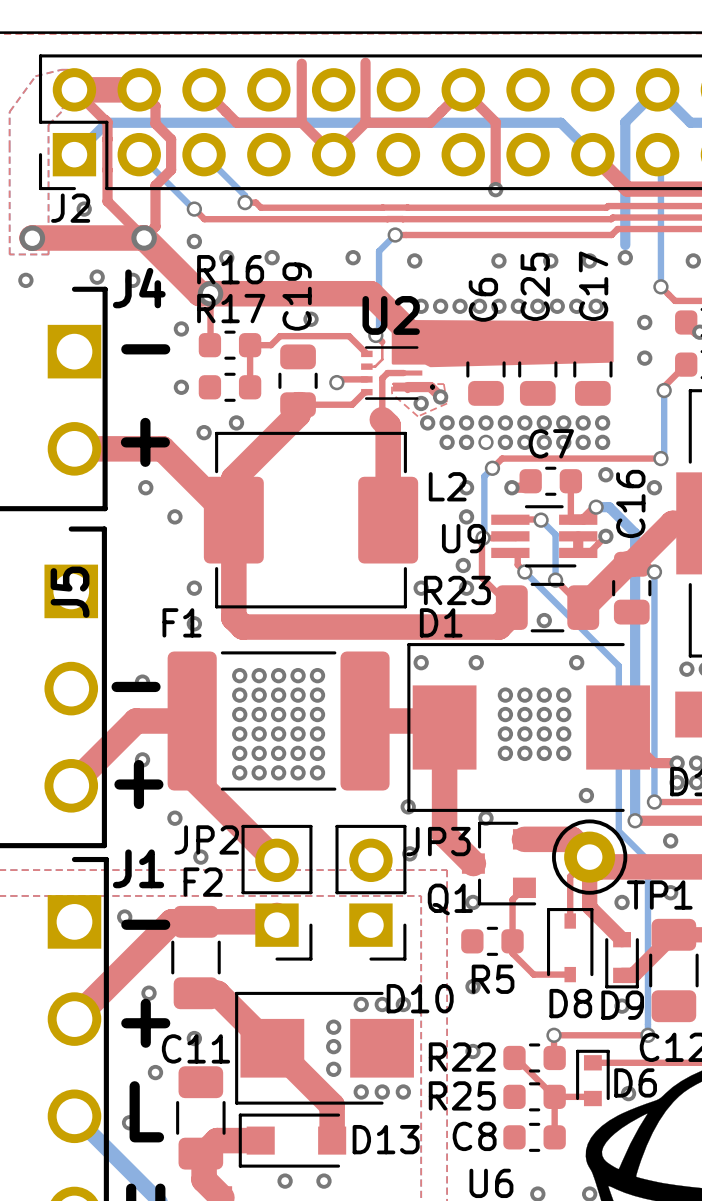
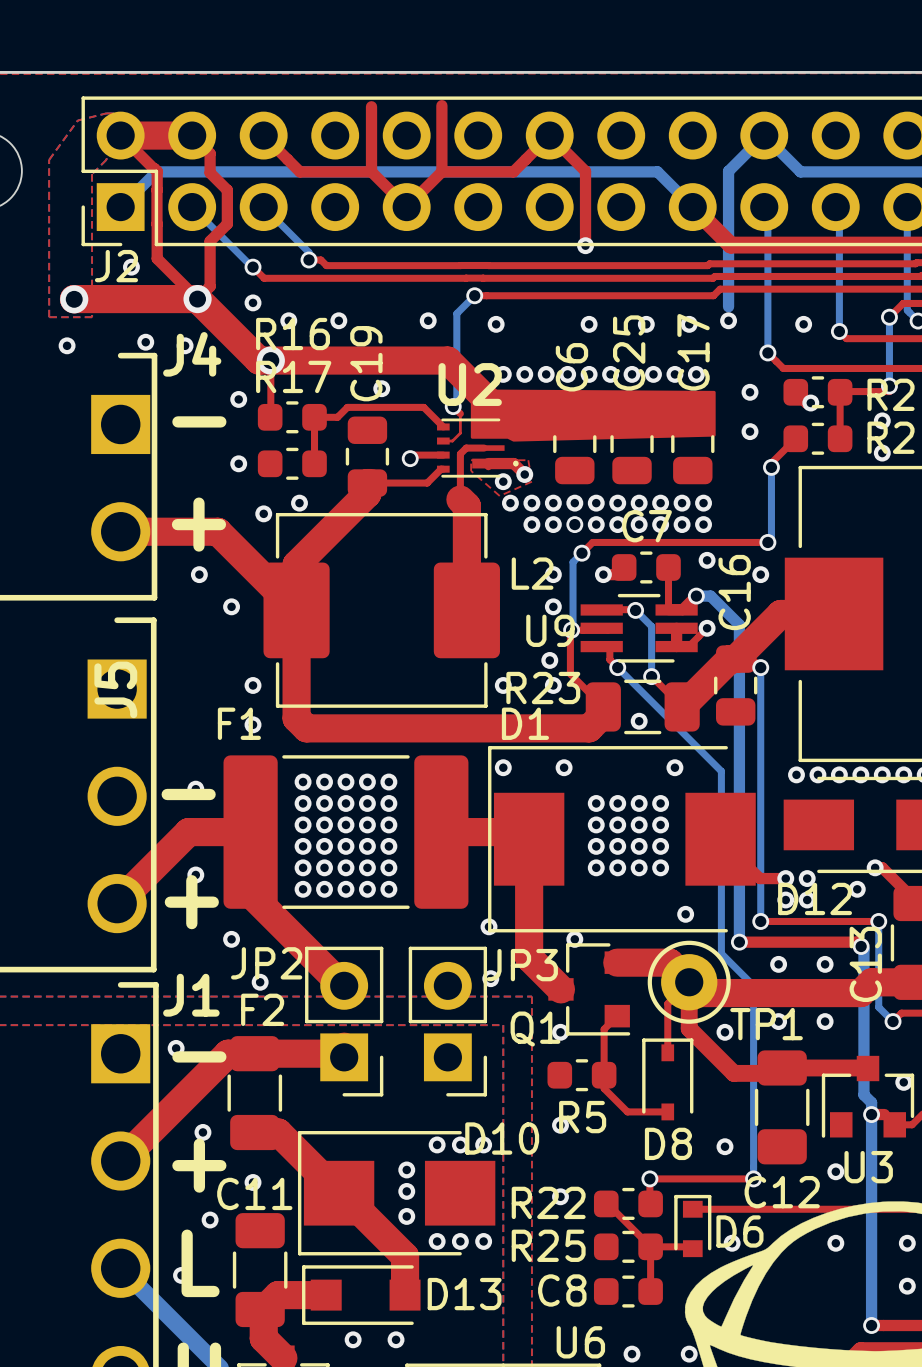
top track: (589, 899) (589, 907) (622, 939) -> (689, 1028) (733, 1073) (776, 1073)
top track: (669, 939) (633, 975) (622, 975) -> none
D9: (622, 960) -> none

